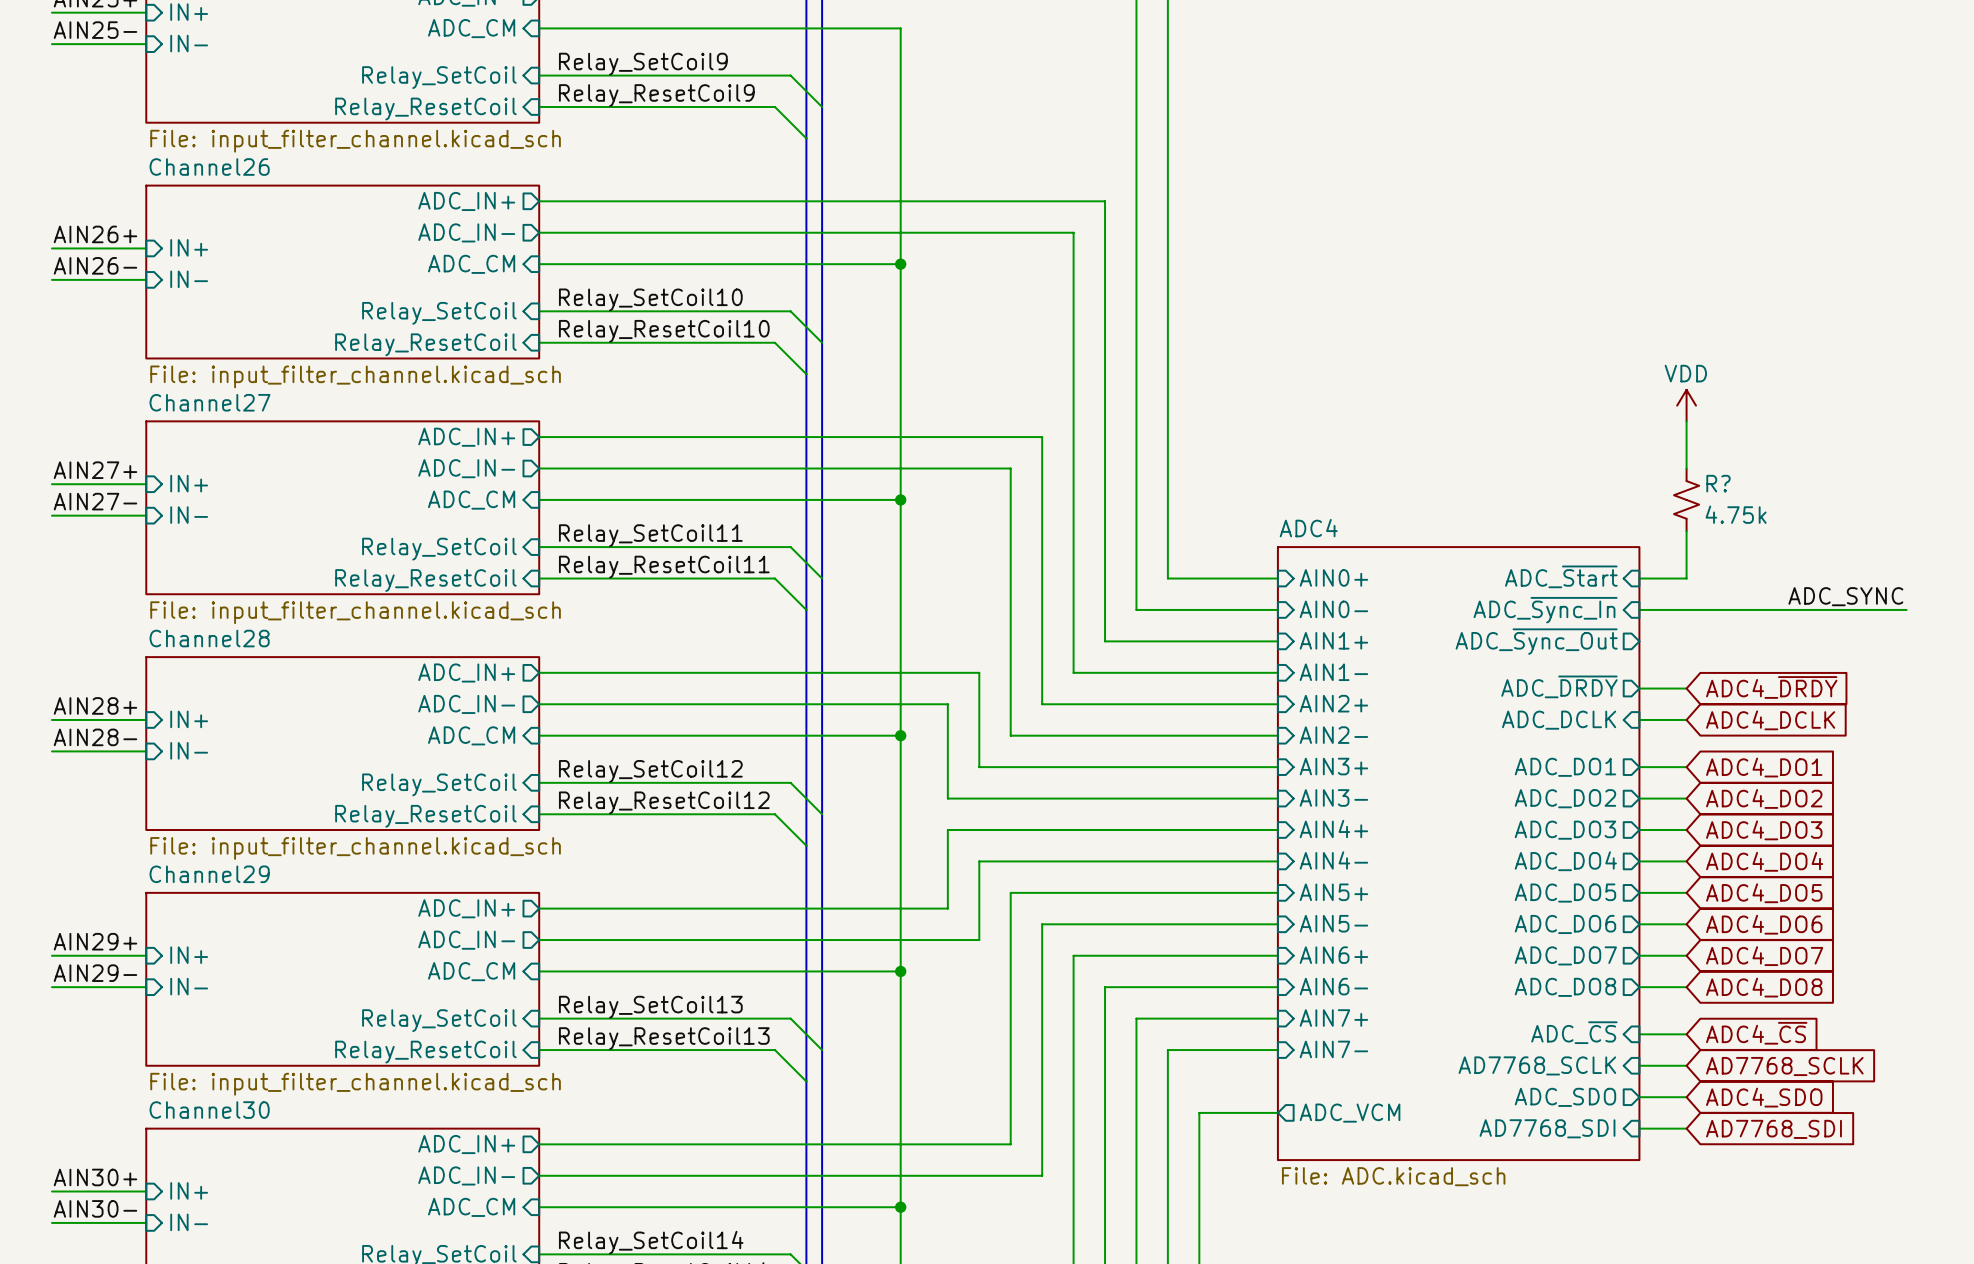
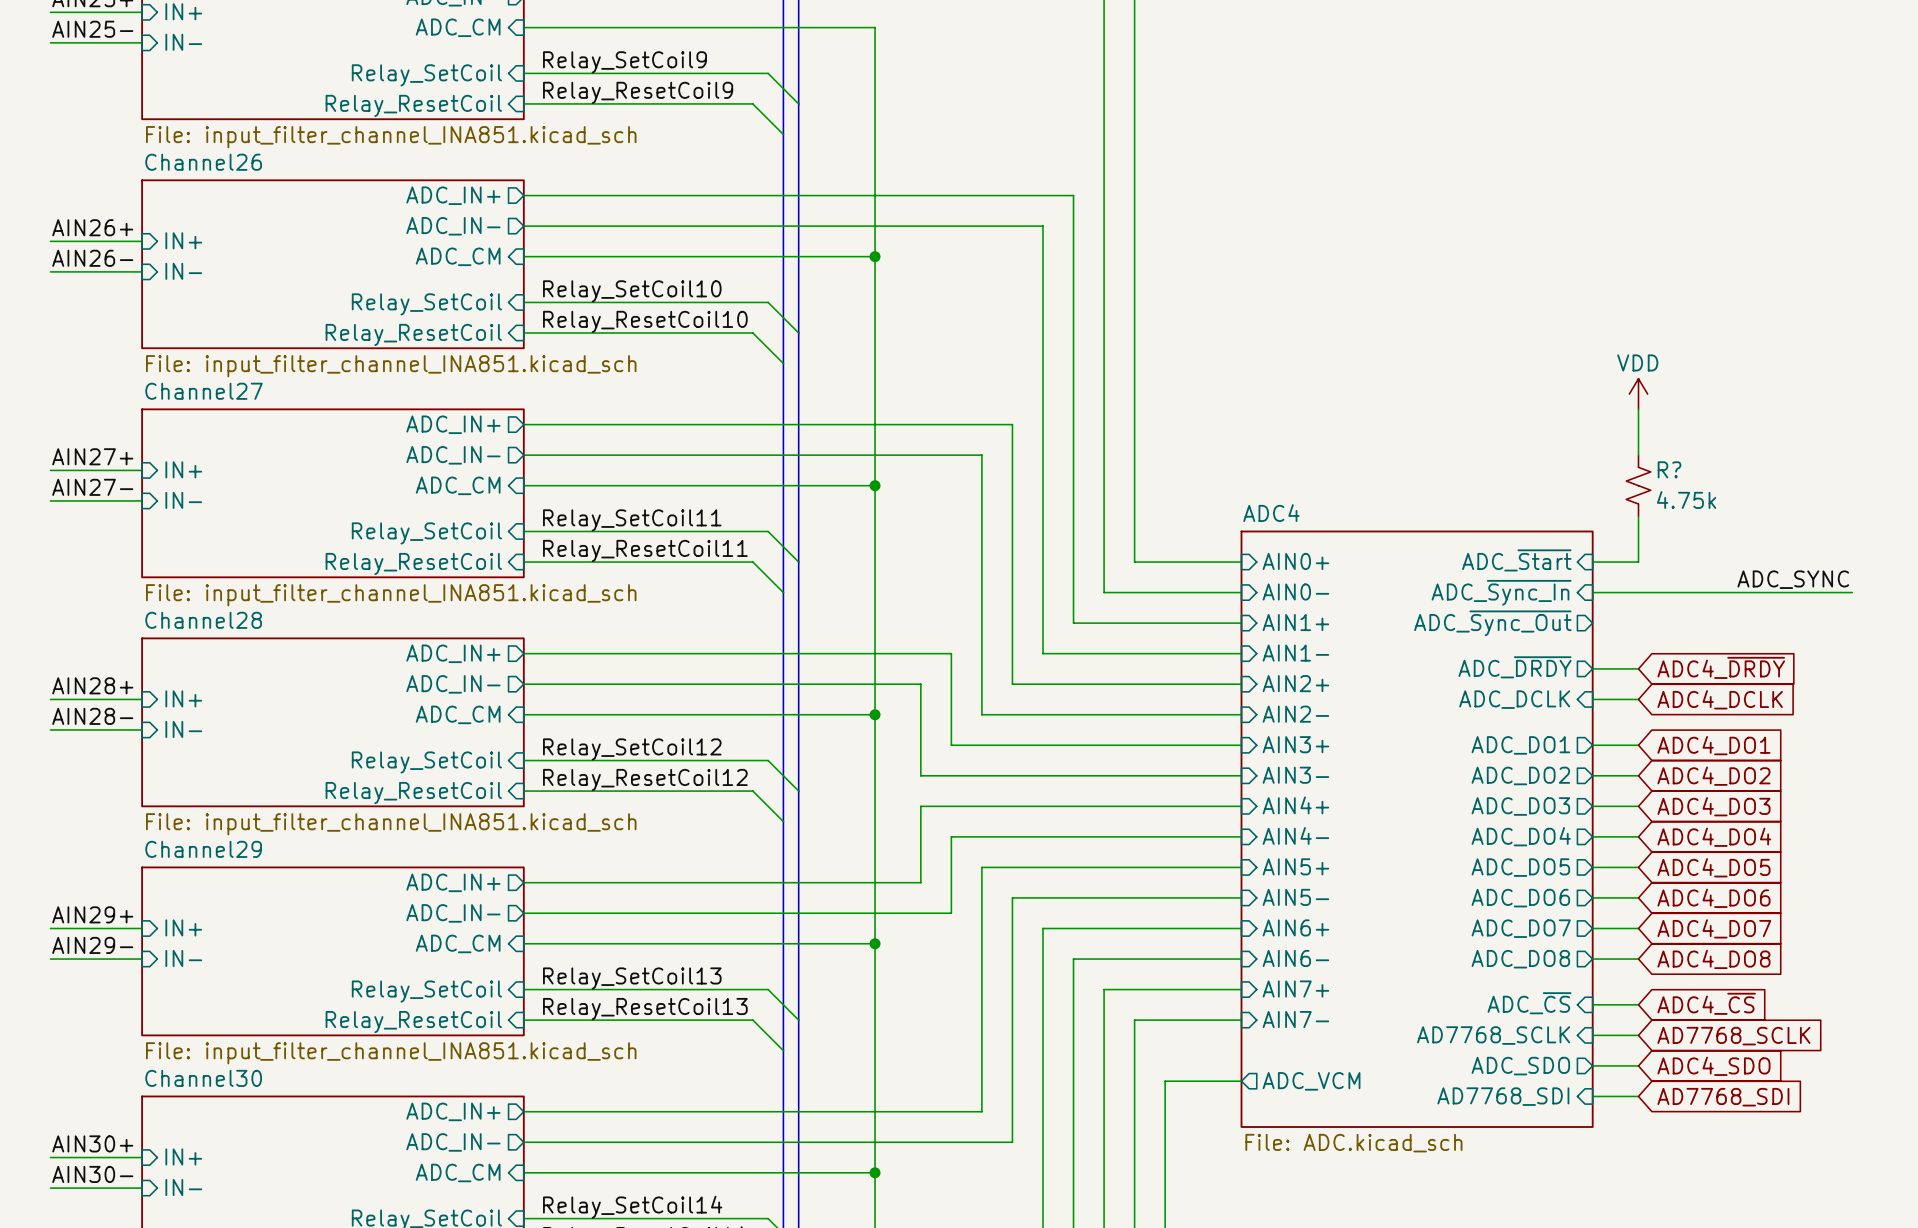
sheet value: File: input_filter_channel.kicad_sch (355, 141) -> File: input_filter_channel_INA851.kicad_sch (391, 137)
sheet Channel26 value: File: input_filter_channel.kicad_sch (355, 376) -> File: input_filter_channel_INA851.kicad_sch (391, 366)
sheet Channel27 value: File: input_filter_channel.kicad_sch (355, 612) -> File: input_filter_channel_INA851.kicad_sch (391, 595)
sheet Channel28 value: File: input_filter_channel.kicad_sch (355, 848) -> File: input_filter_channel_INA851.kicad_sch (391, 824)
sheet Channel29 value: File: input_filter_channel.kicad_sch (355, 1084) -> File: input_filter_channel_INA851.kicad_sch (391, 1053)

